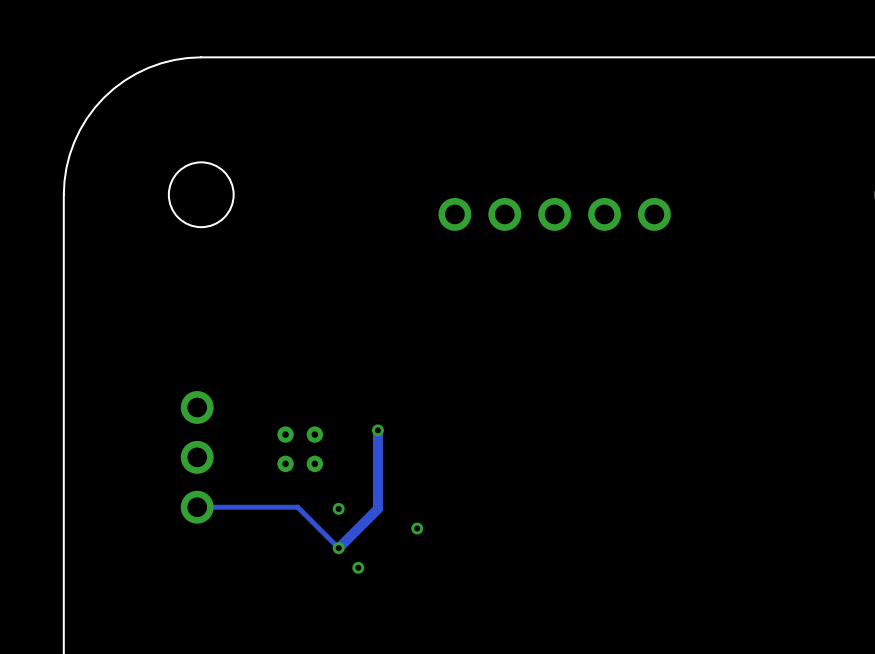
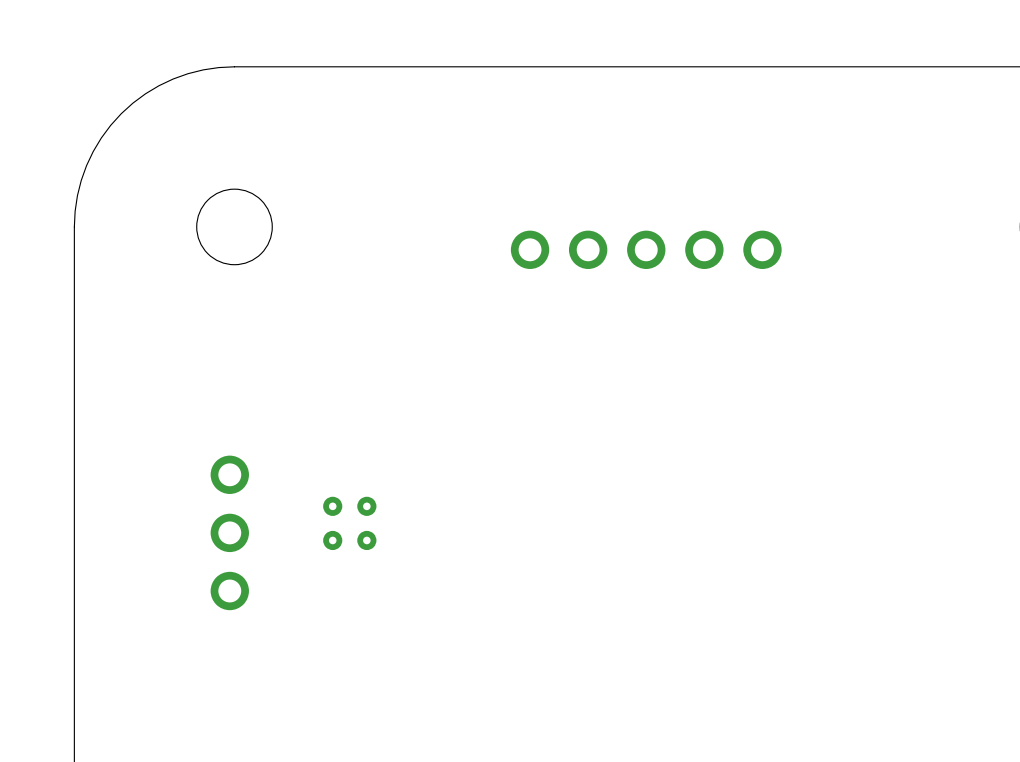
track: (377, 430) (377, 508) (338, 548) (297, 507) (197, 507) -> none
via: (377, 430) -> none
via: (338, 508) -> none
via: (417, 528) -> none
via: (338, 548) -> none
via: (358, 567) -> none

